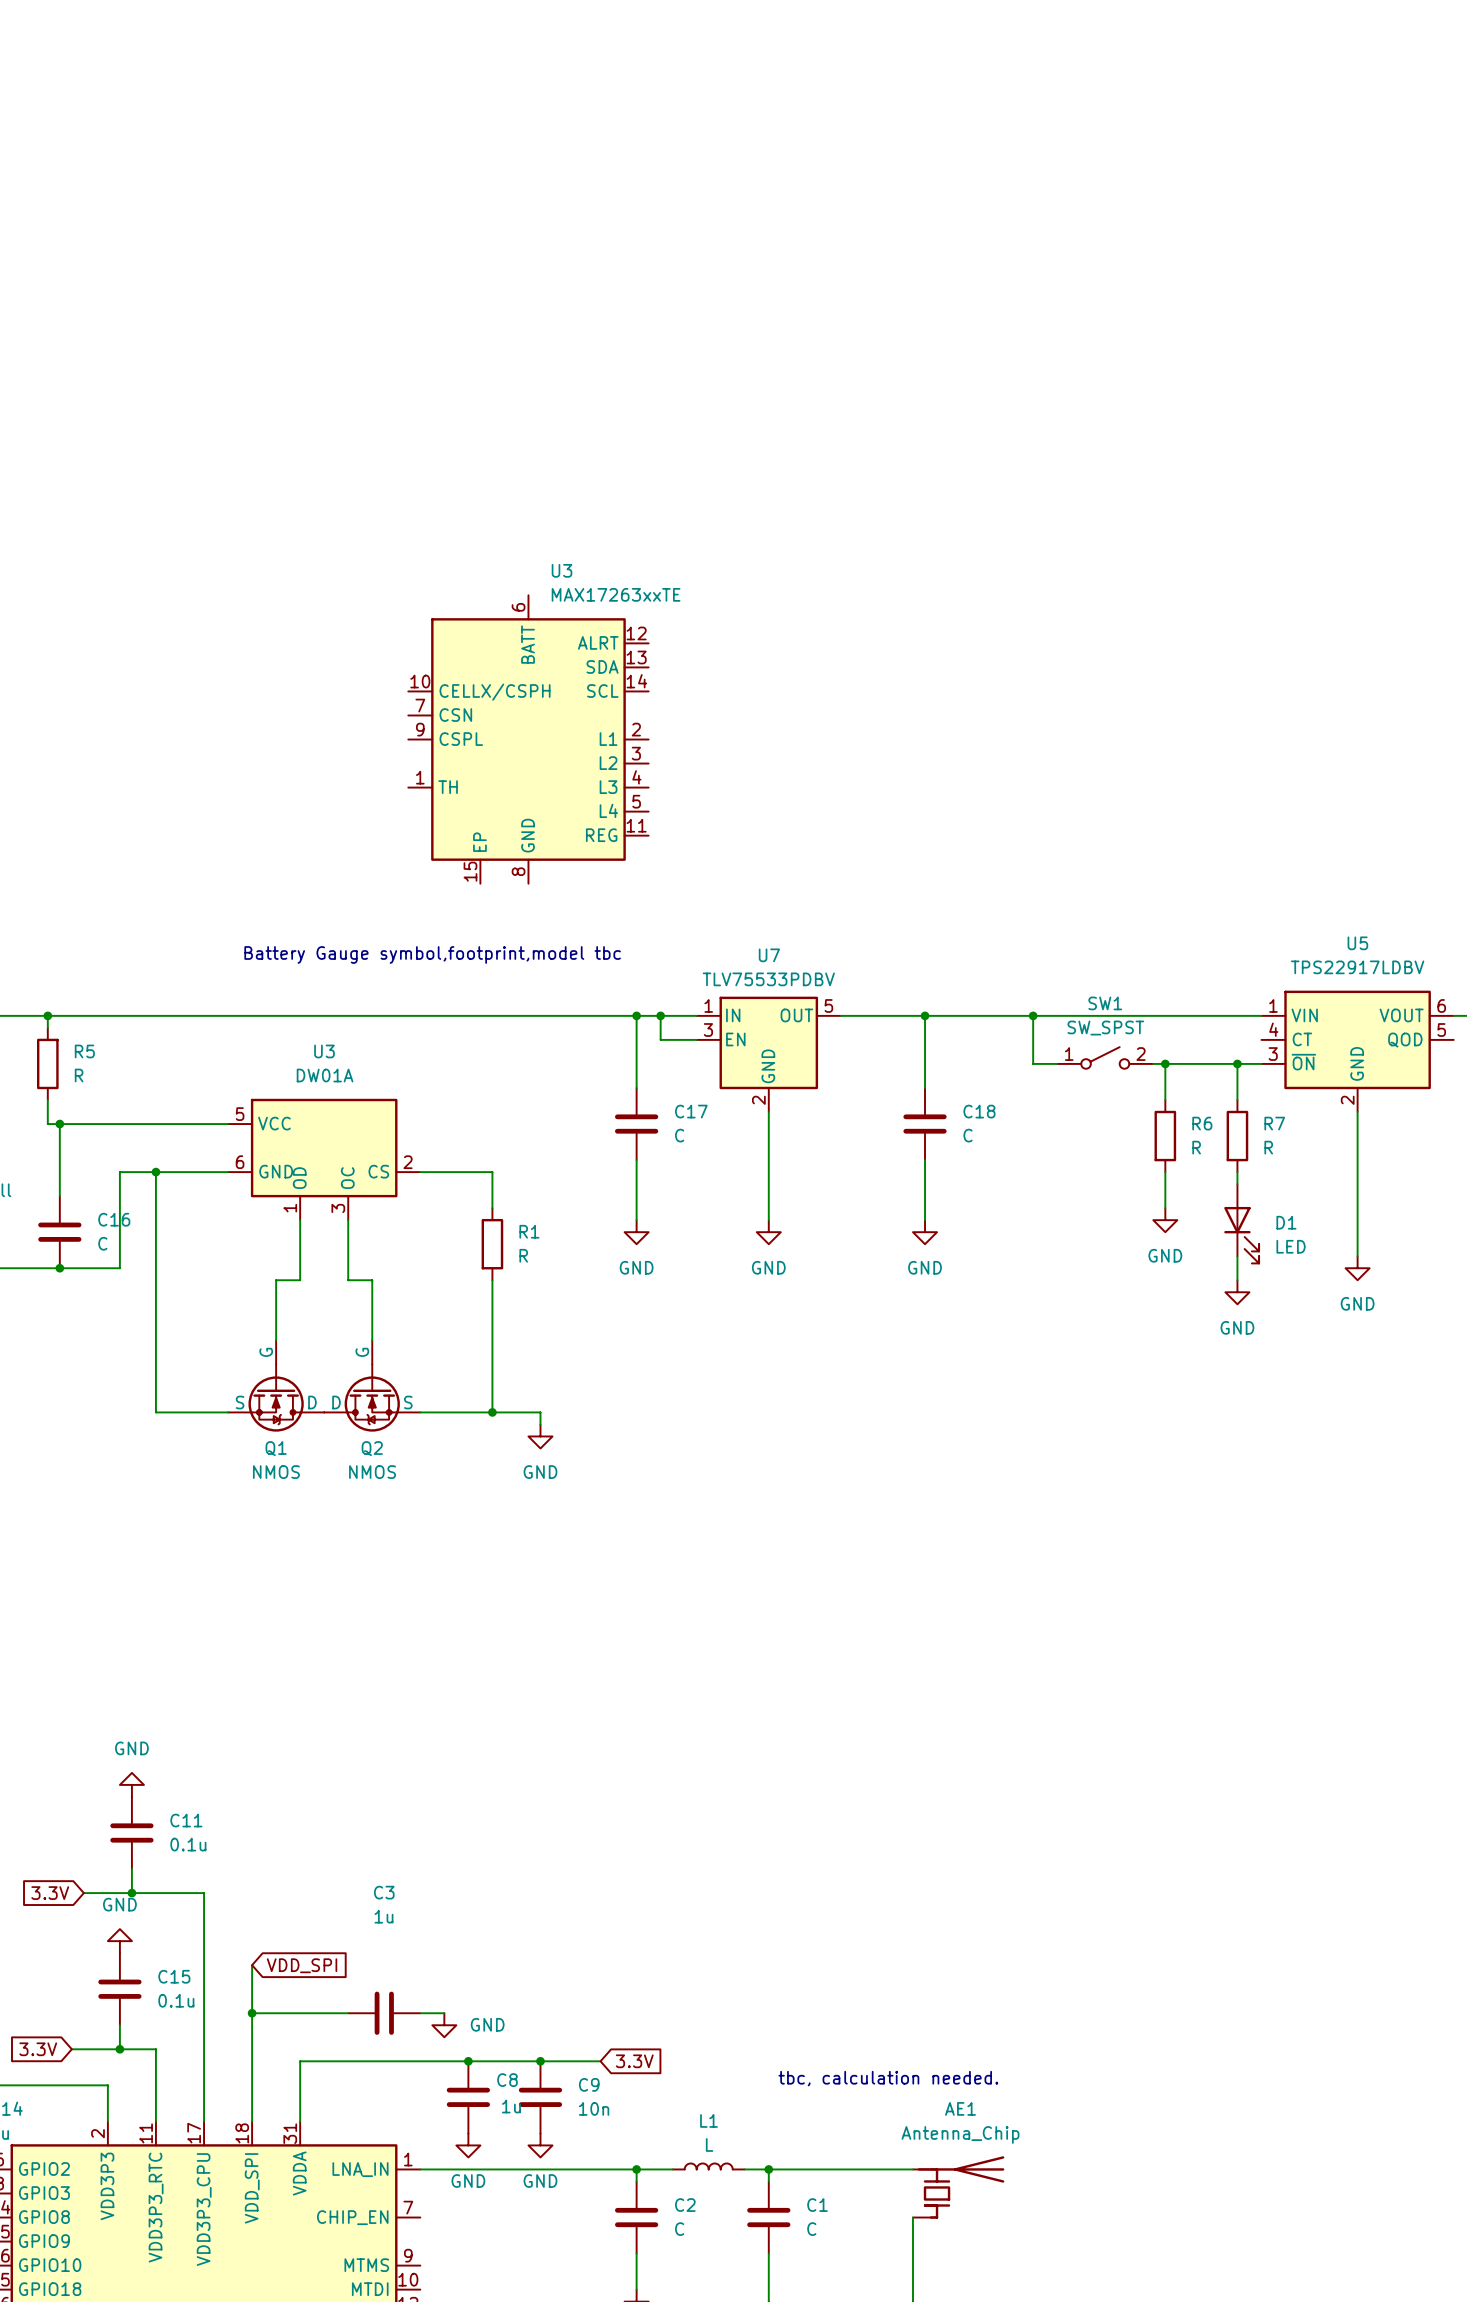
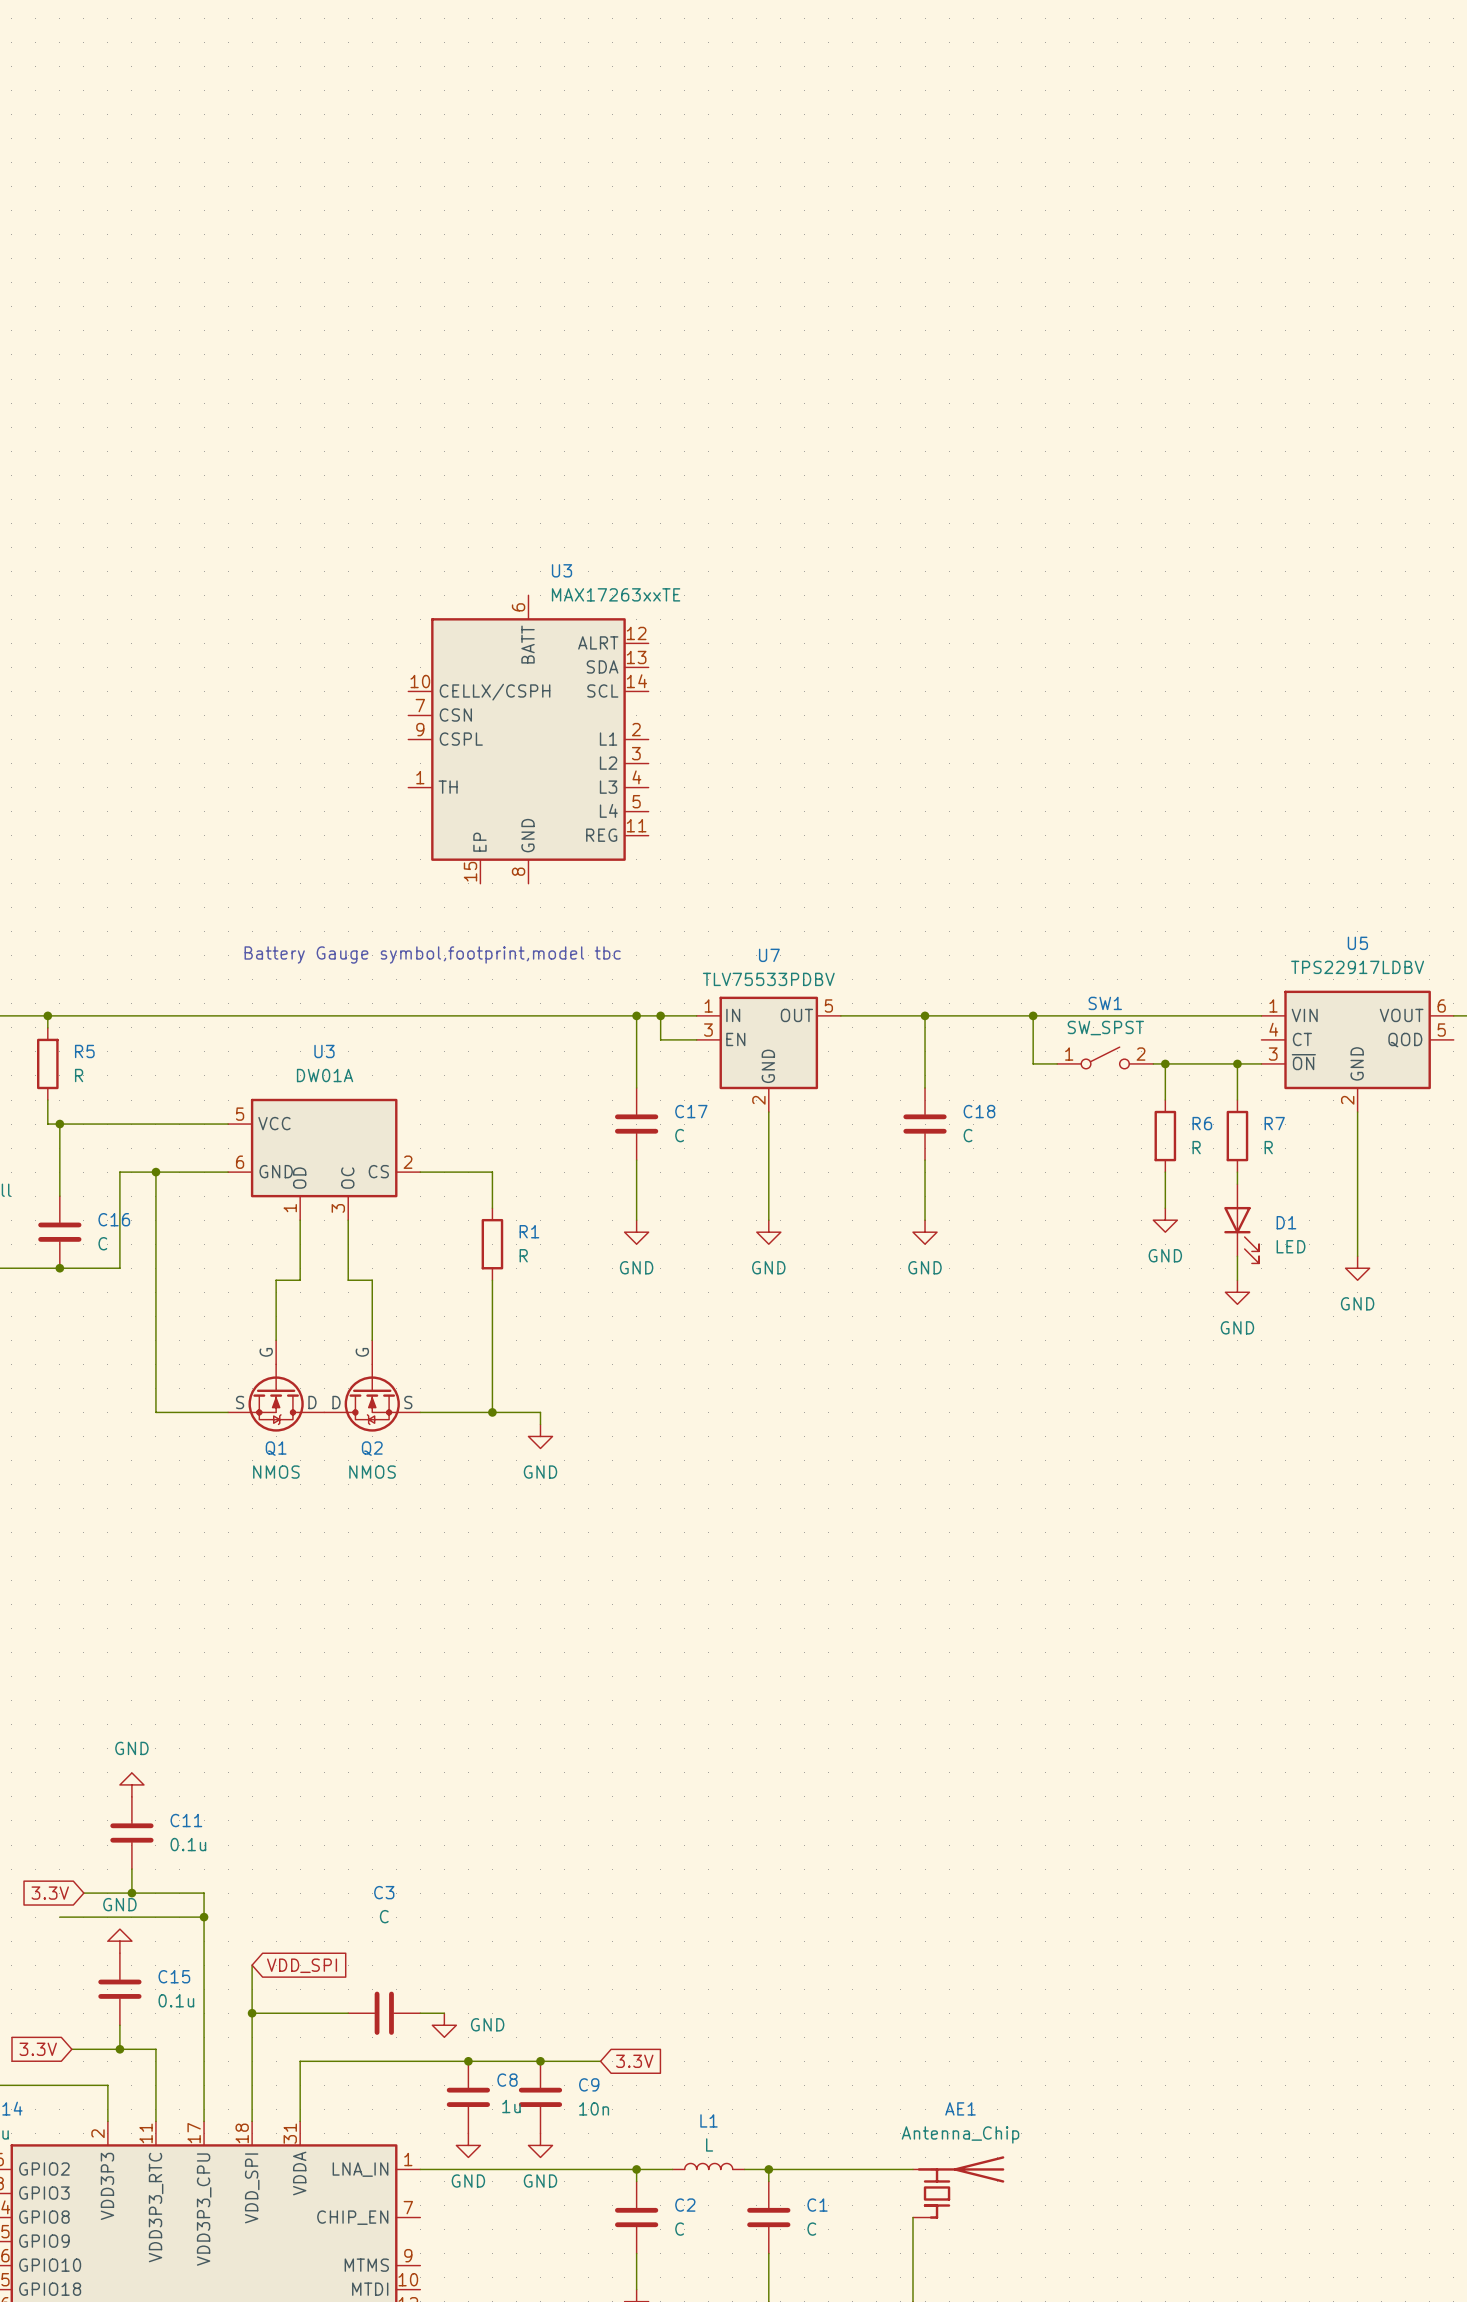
C3 value: 1u (383, 1916) -> C (384, 1916)
wire: none -> (59, 1917) (204, 1917)
junction: none -> (204, 1917)
text: tbc, calculation needed. (888, 2078) -> none

